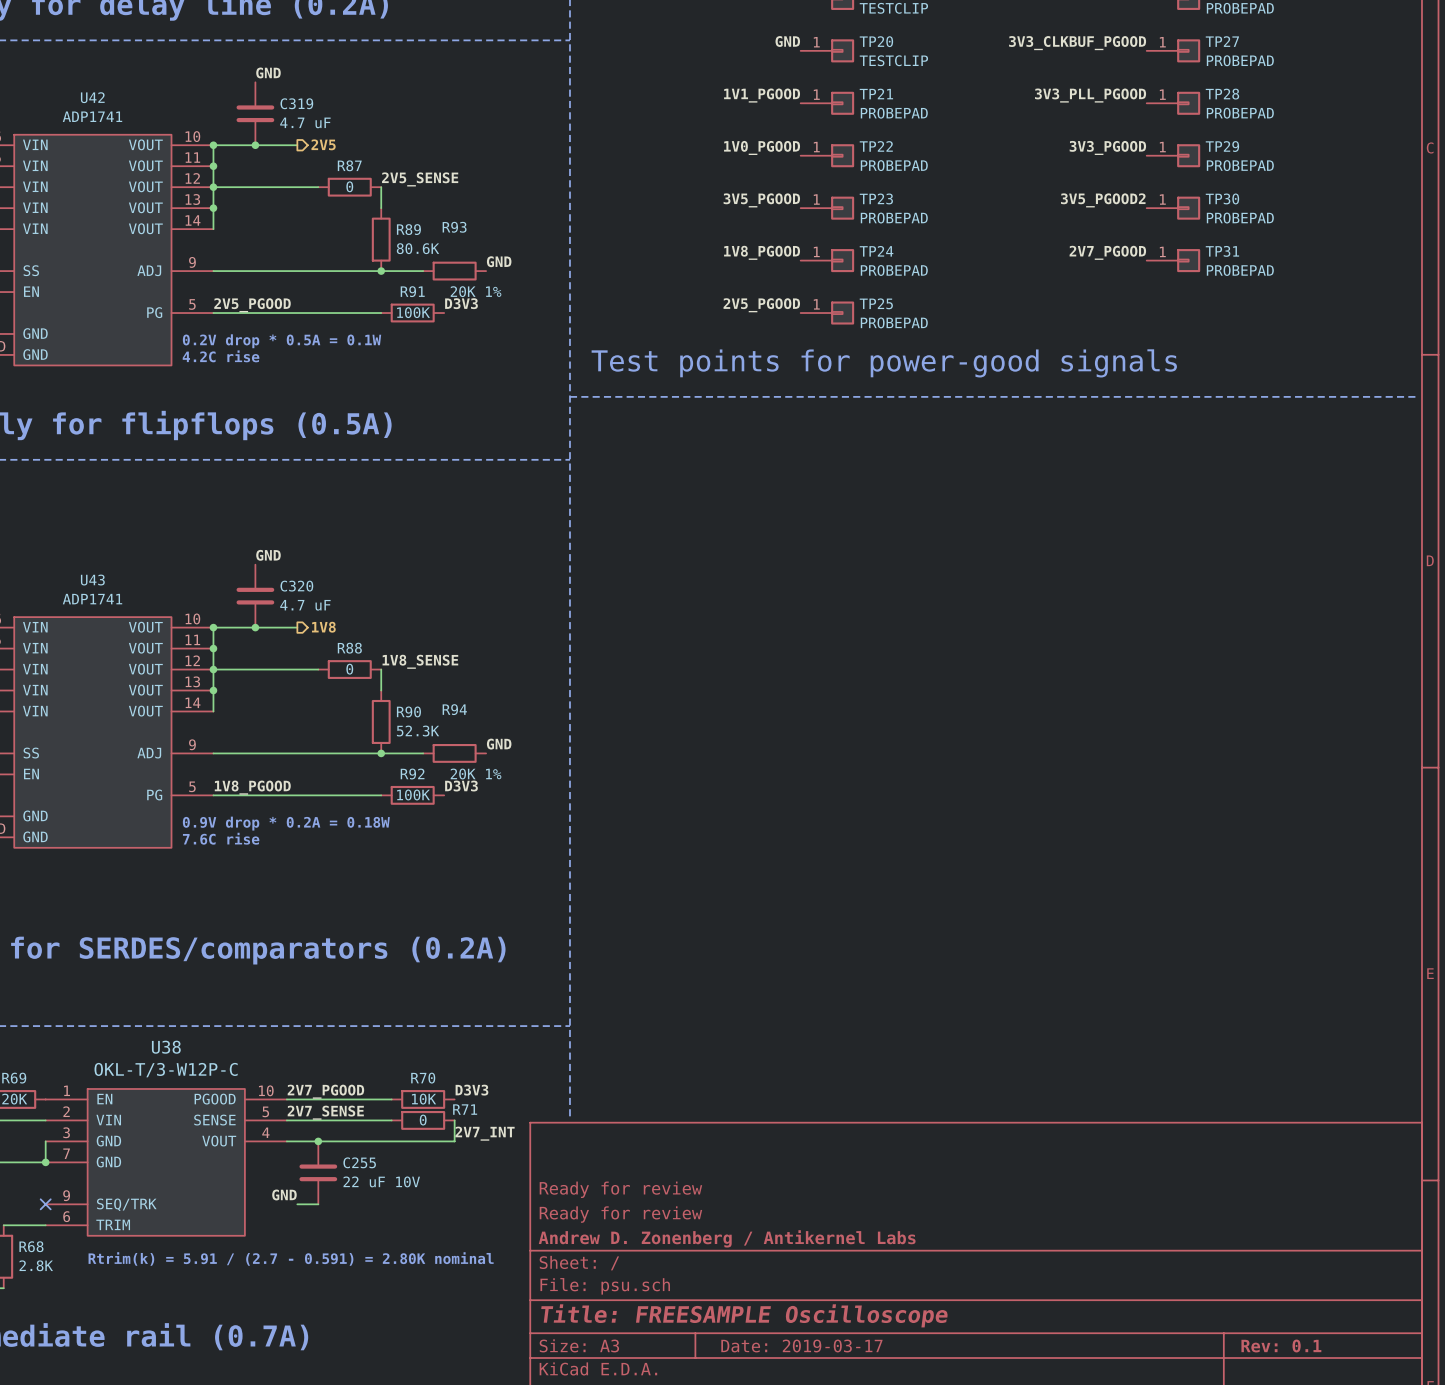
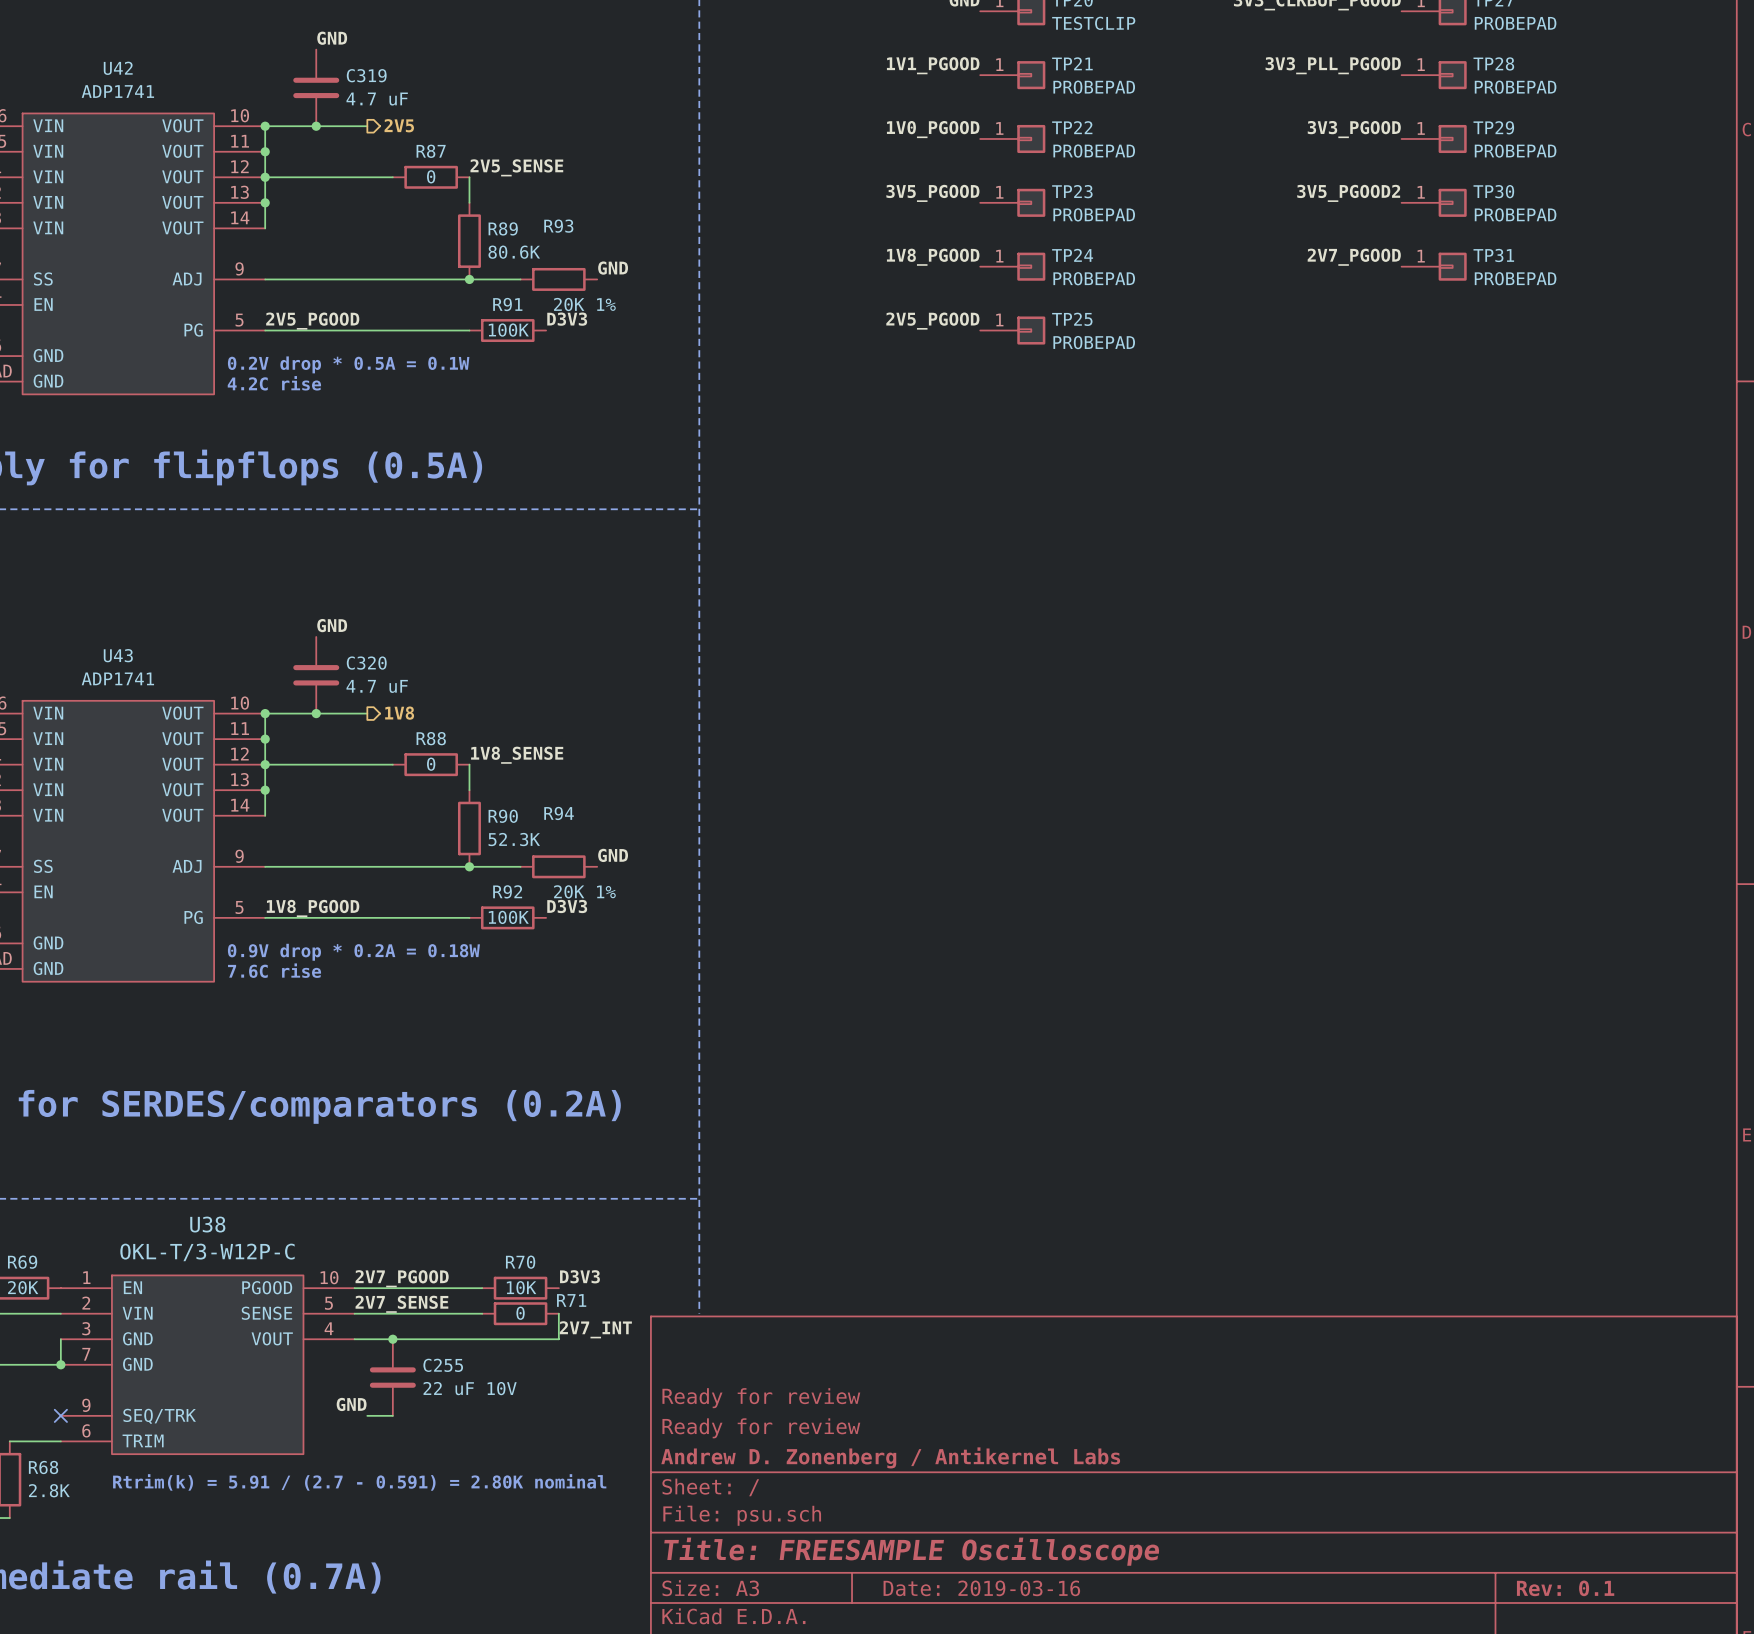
text: Test points for power-good signals (884, 363) -> none
line: (569, 396) (1419, 396) -> none
title block: Date: 2019-03-17 (801, 1345) -> Date: 2019-03-16 (981, 1588)

